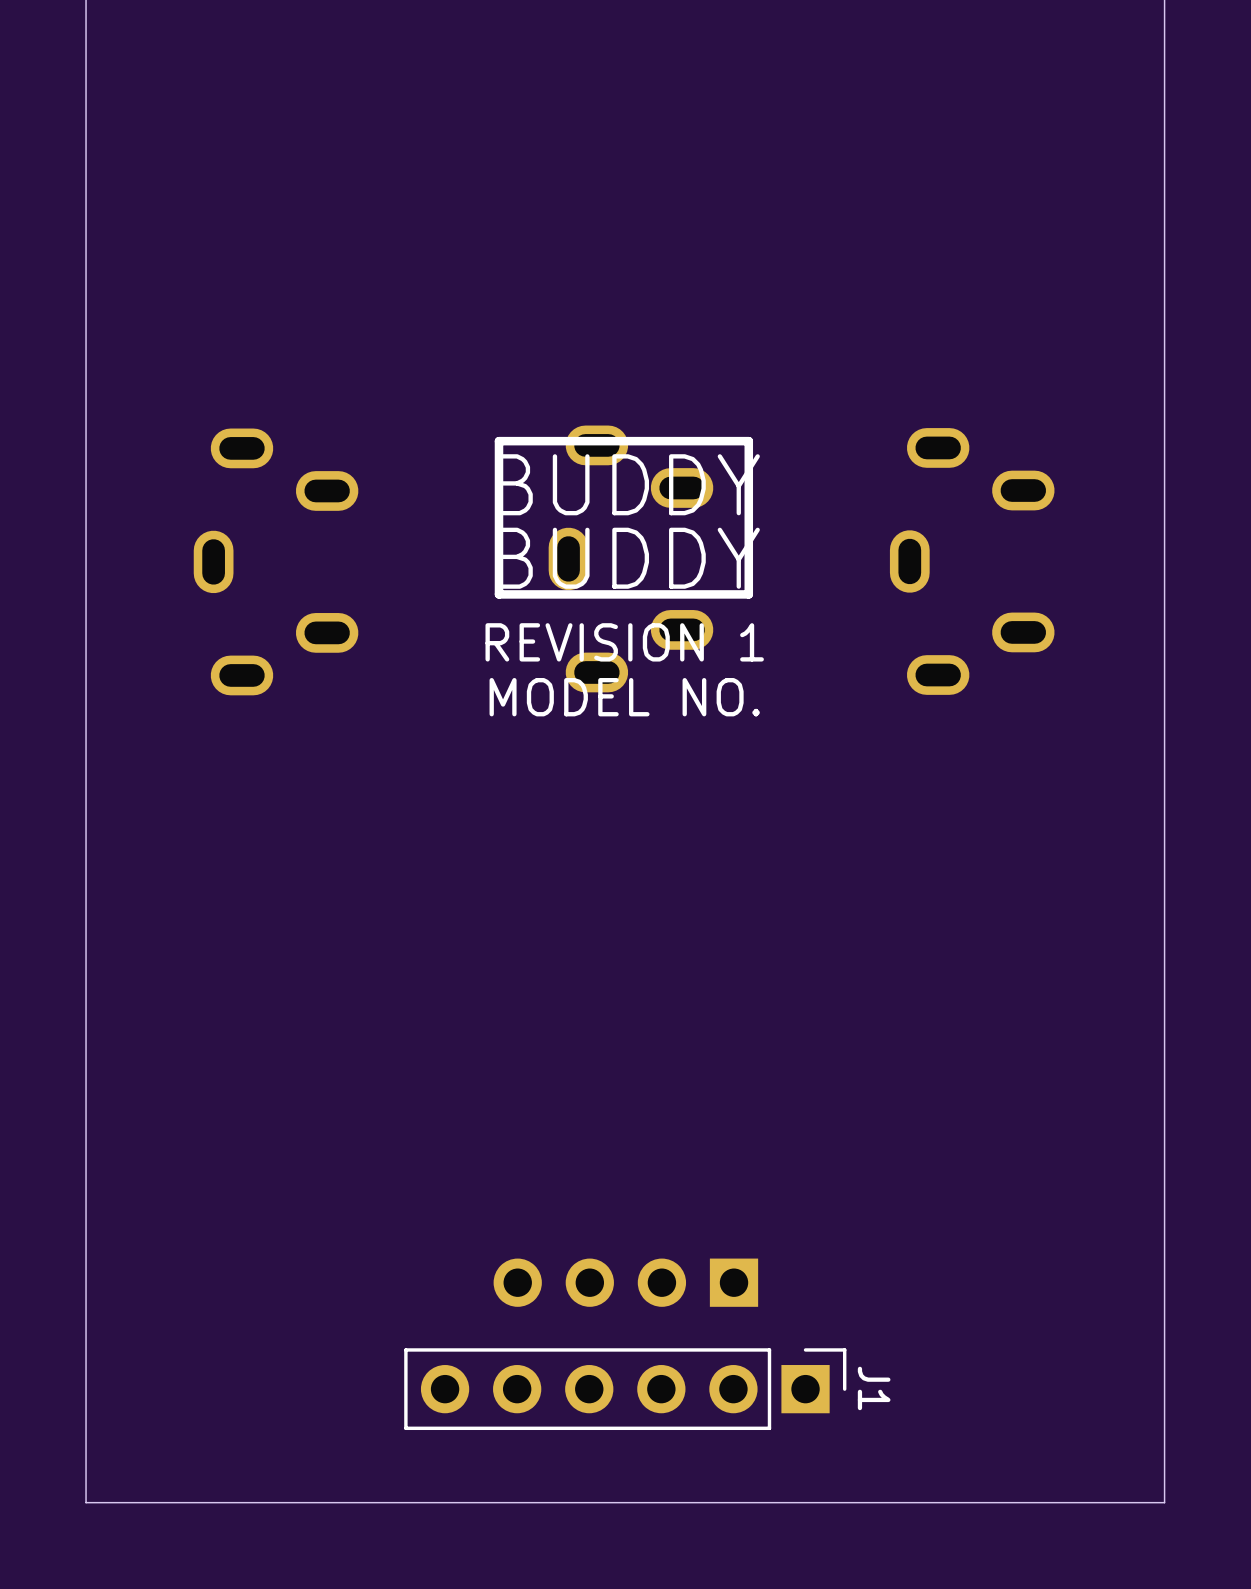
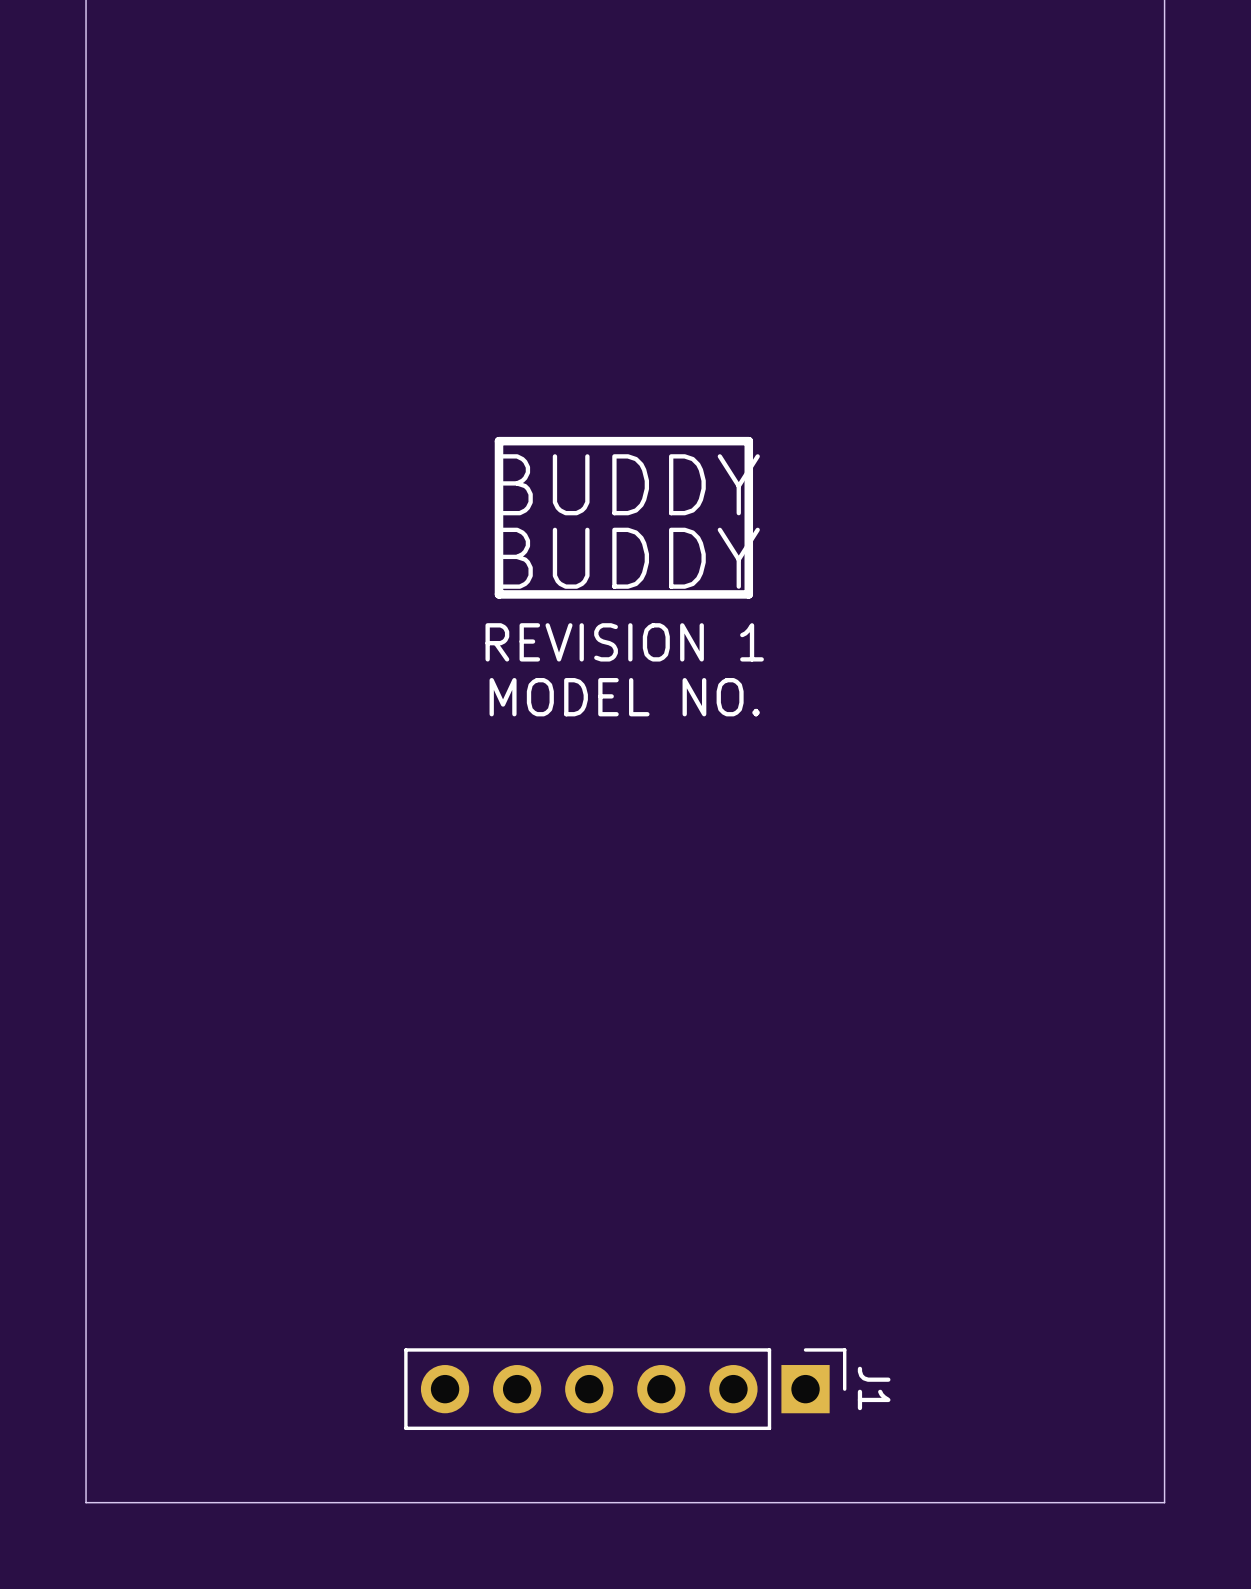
part: (630, 558) -> none
part: (276, 561) -> none
part: (972, 561) -> none
part: (625, 1282) -> none

